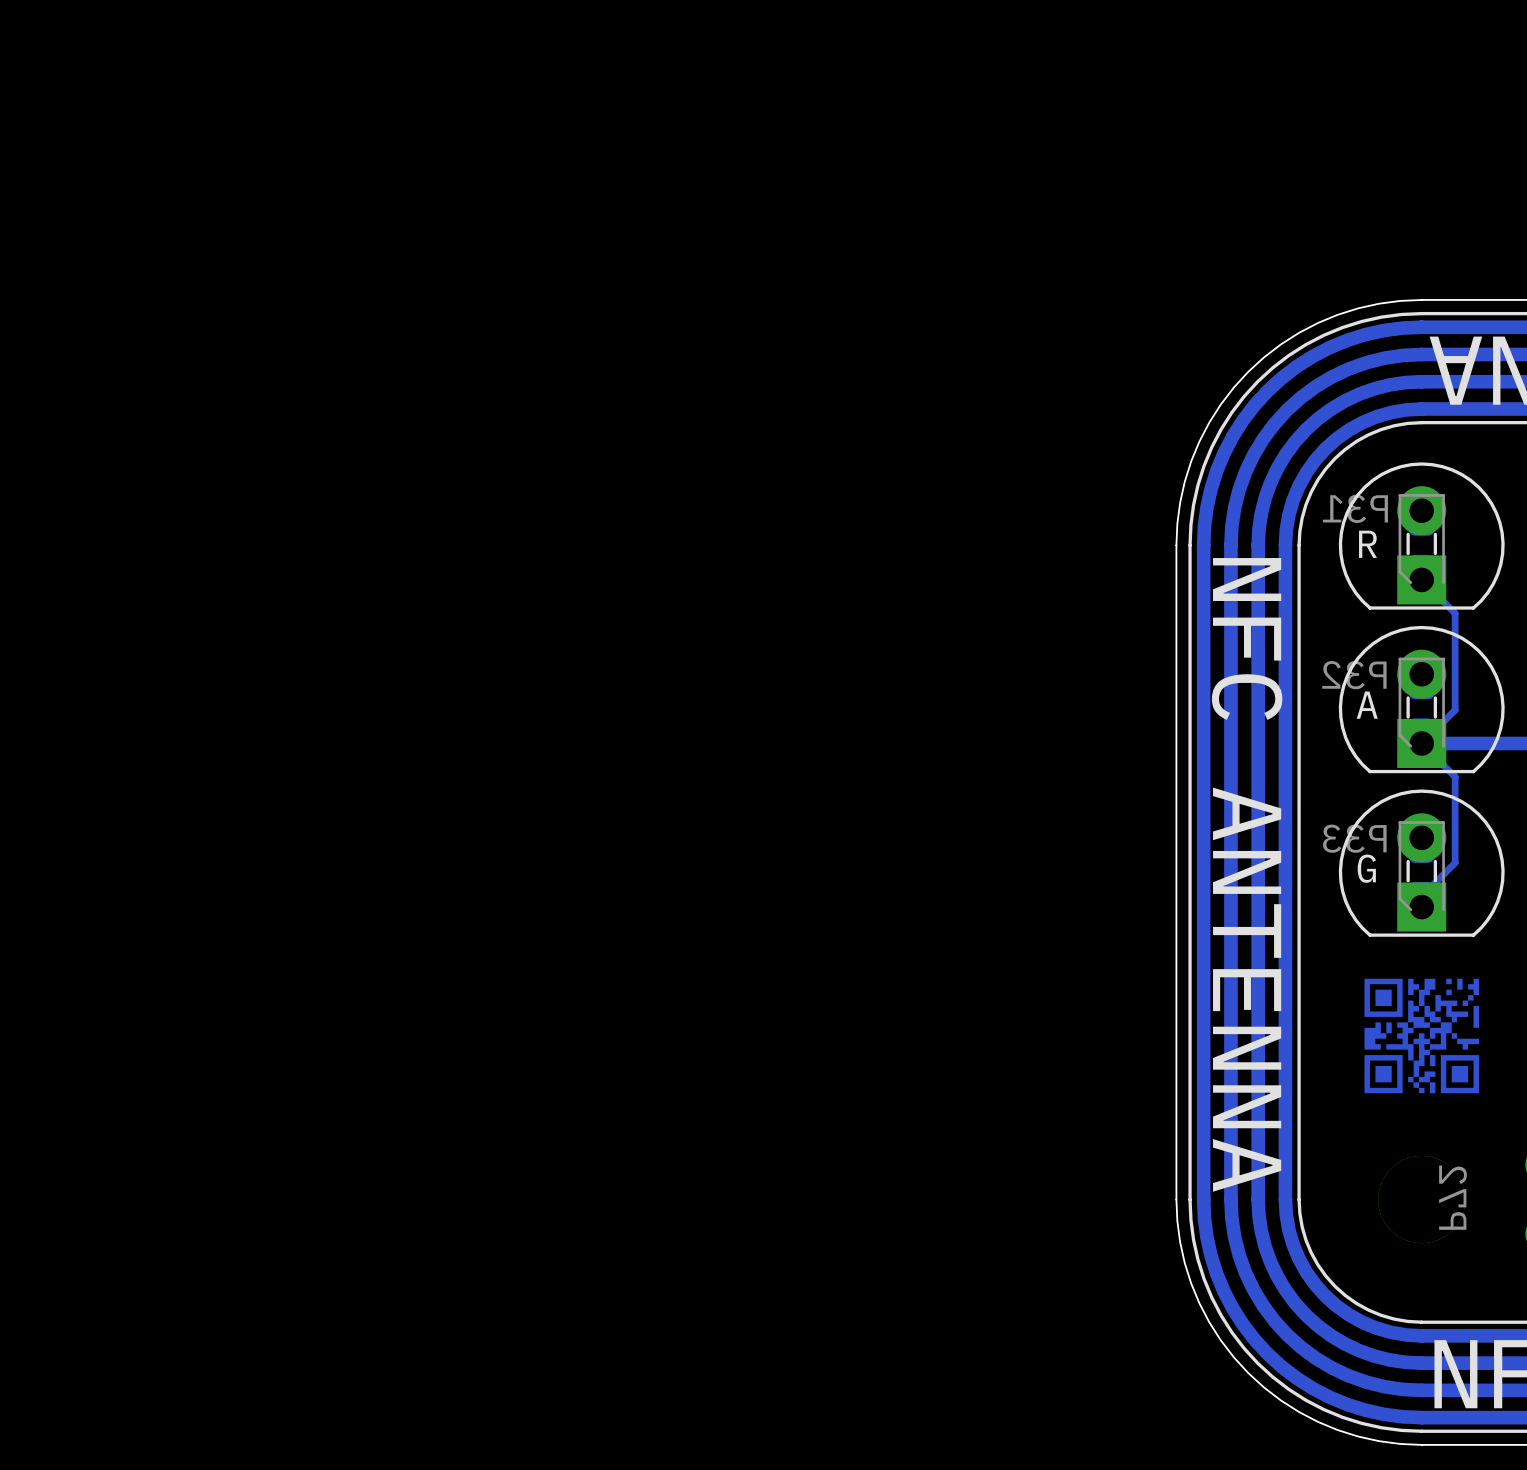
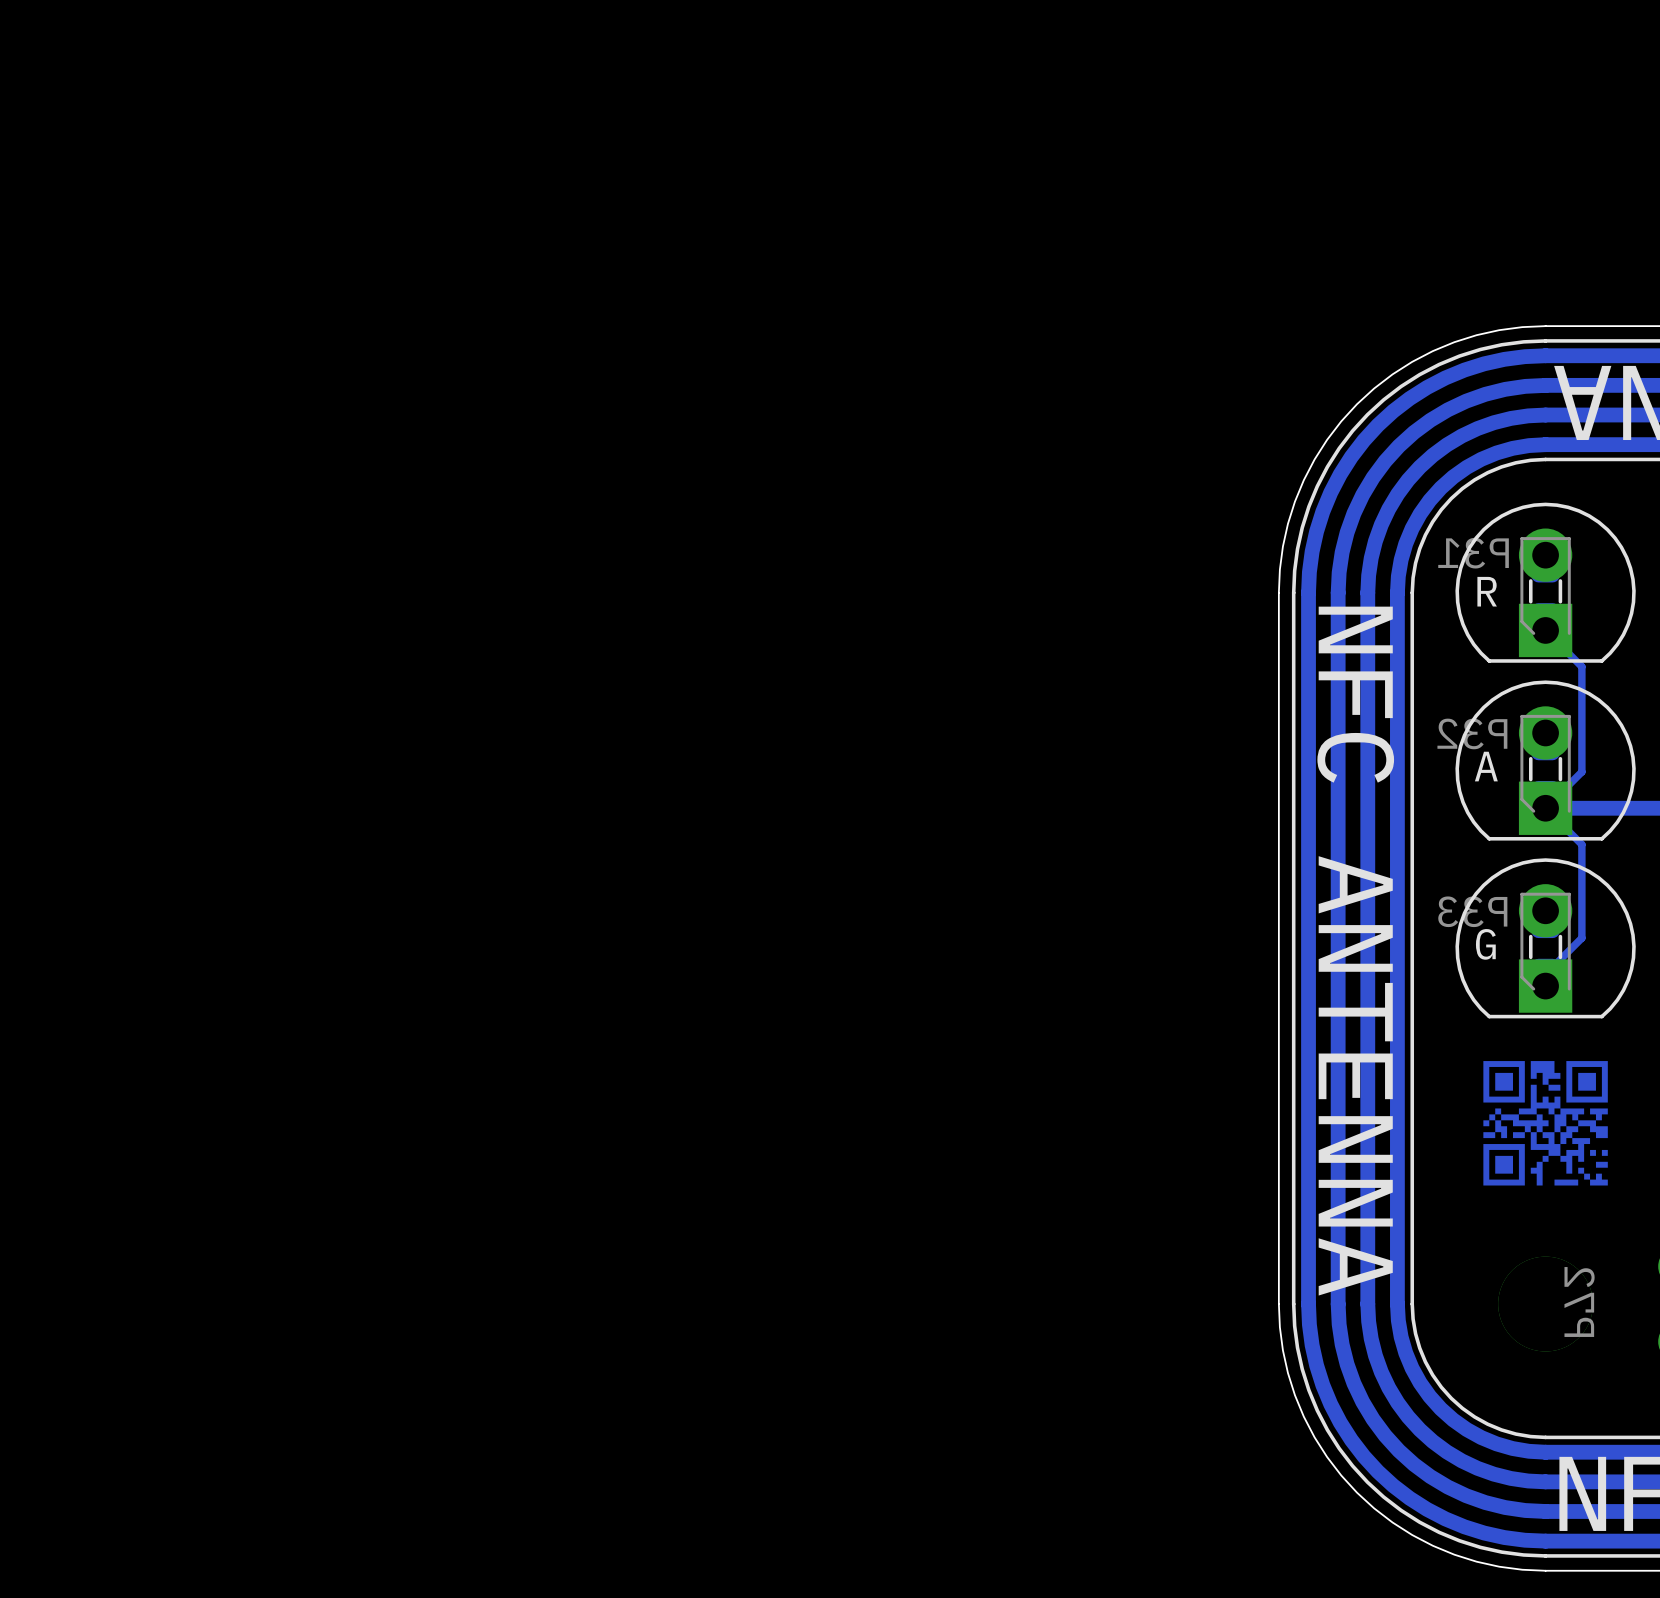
part rotation: 0° (1421, 1036) -> 90° clockwise (1545, 1123)

